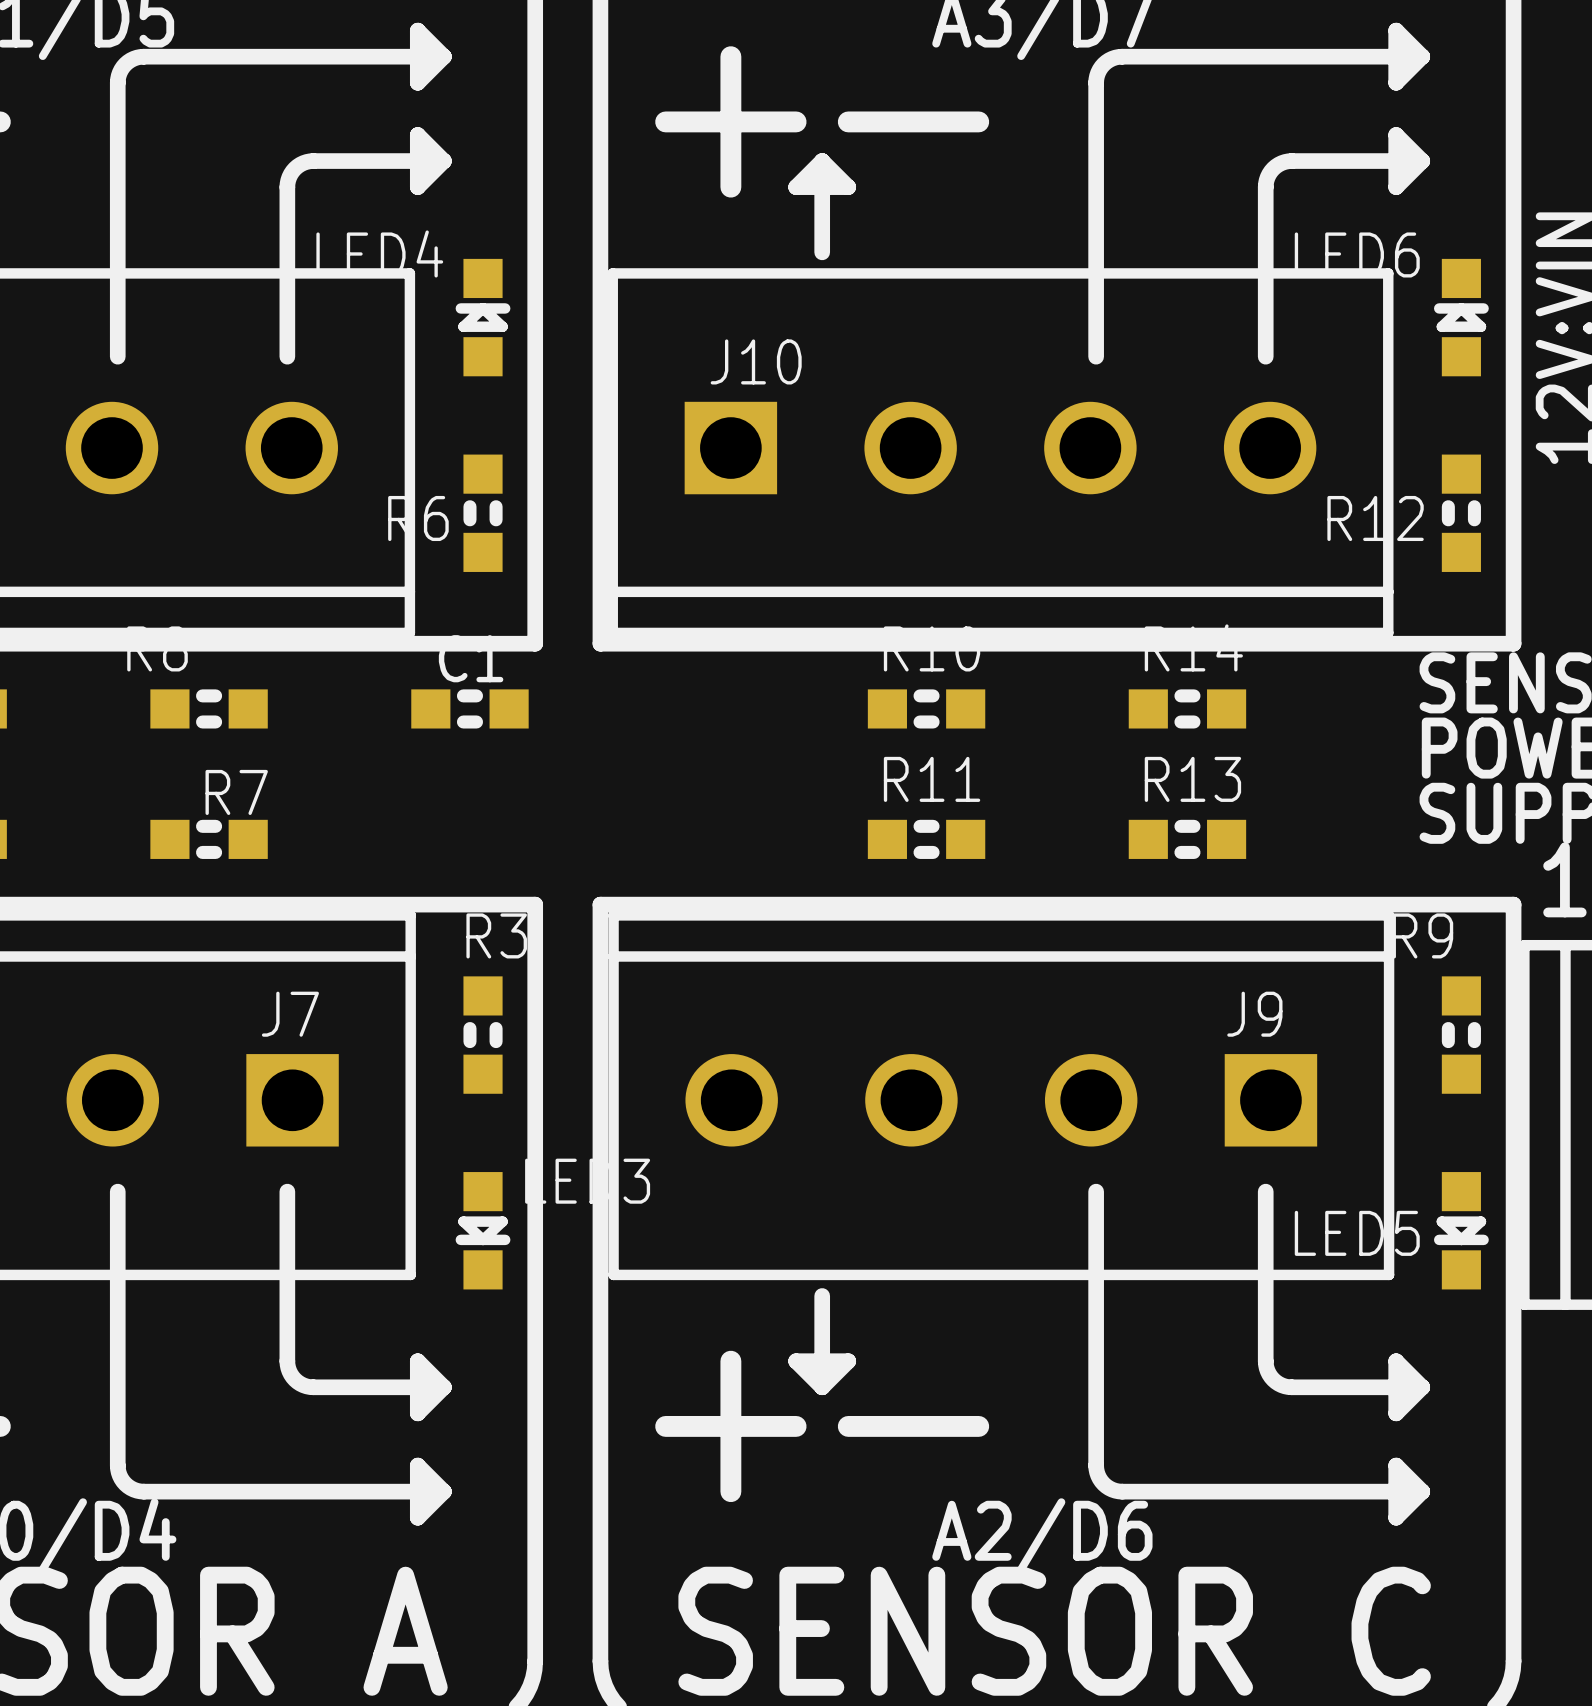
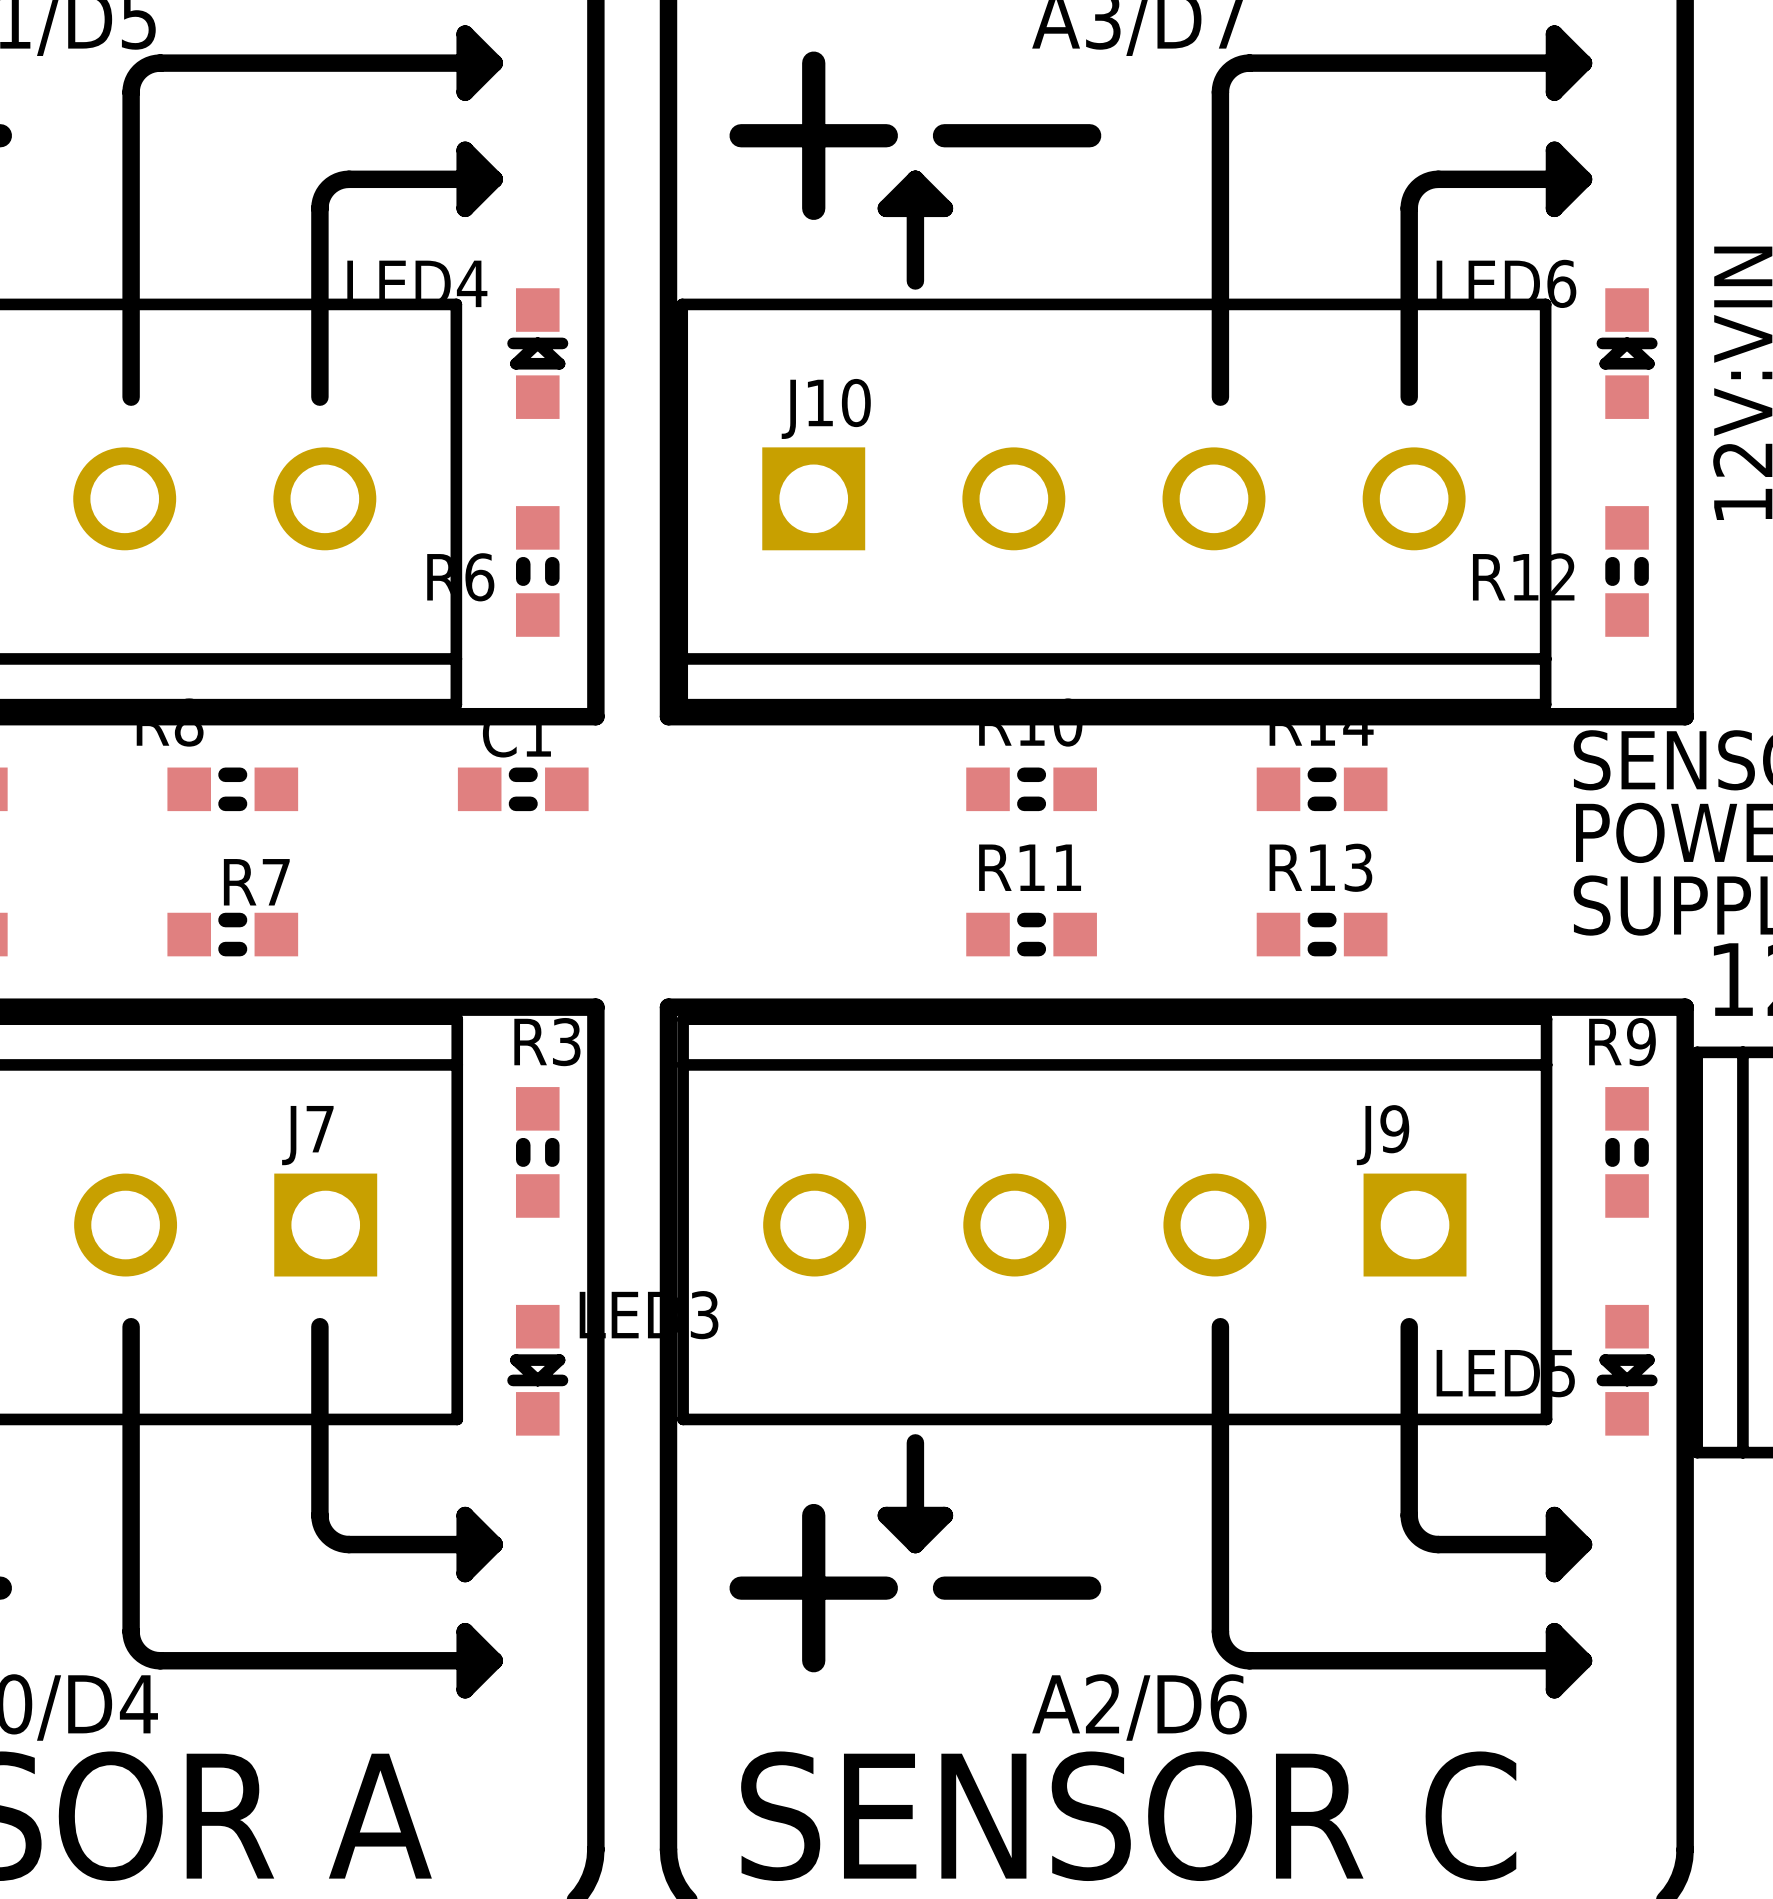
R9 name position: R9 (1422, 935) -> R9 (1622, 1042)

